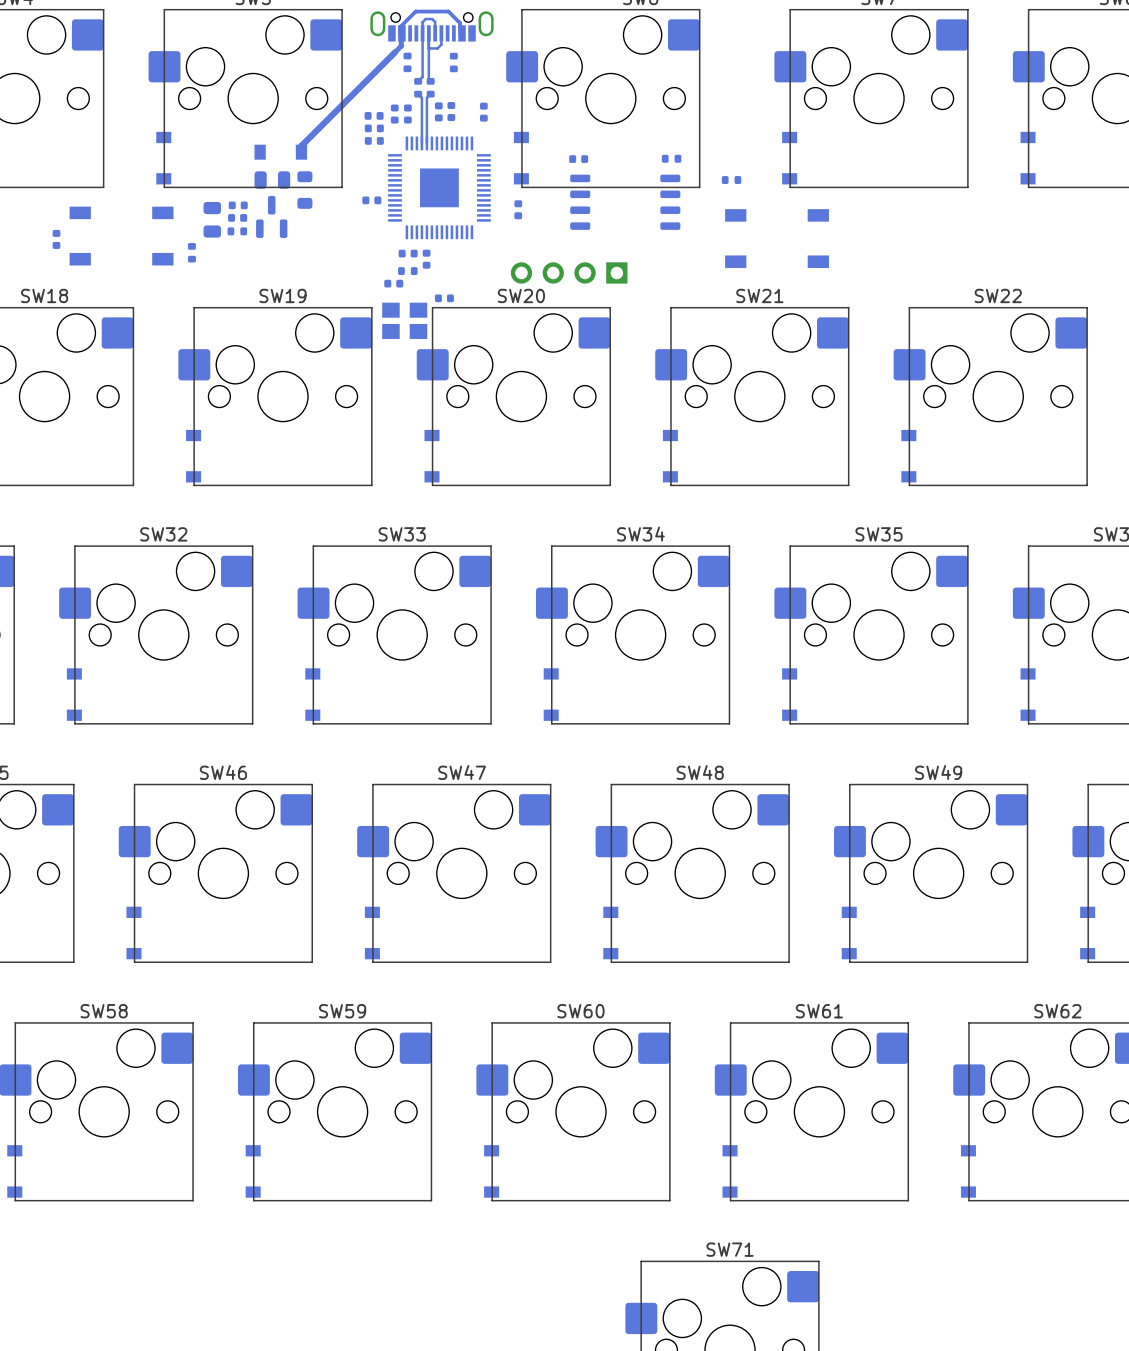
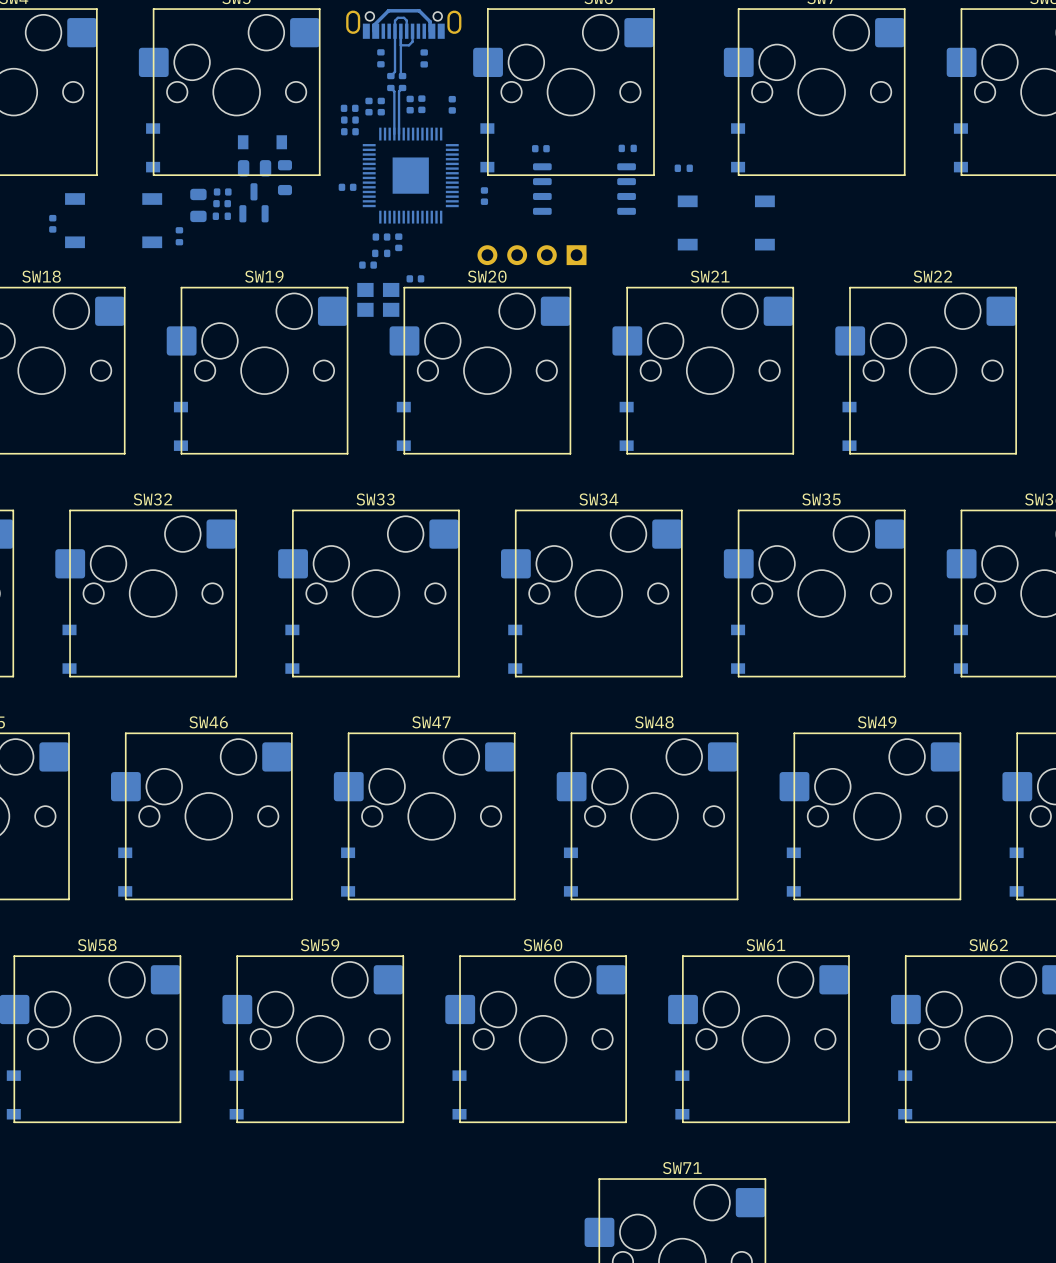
bottom track: (400, 34) (401, 46) (301, 145) (301, 152) -> none

